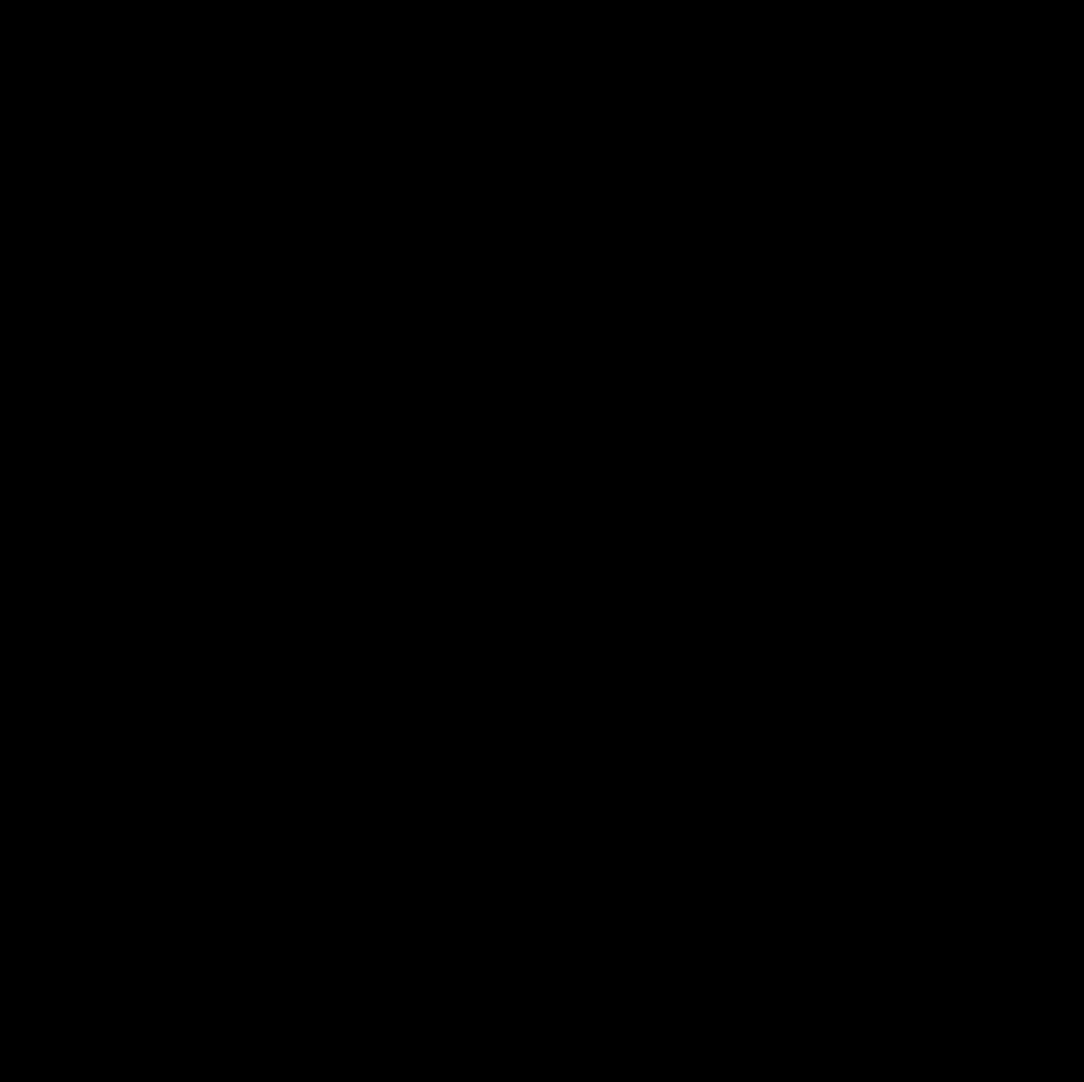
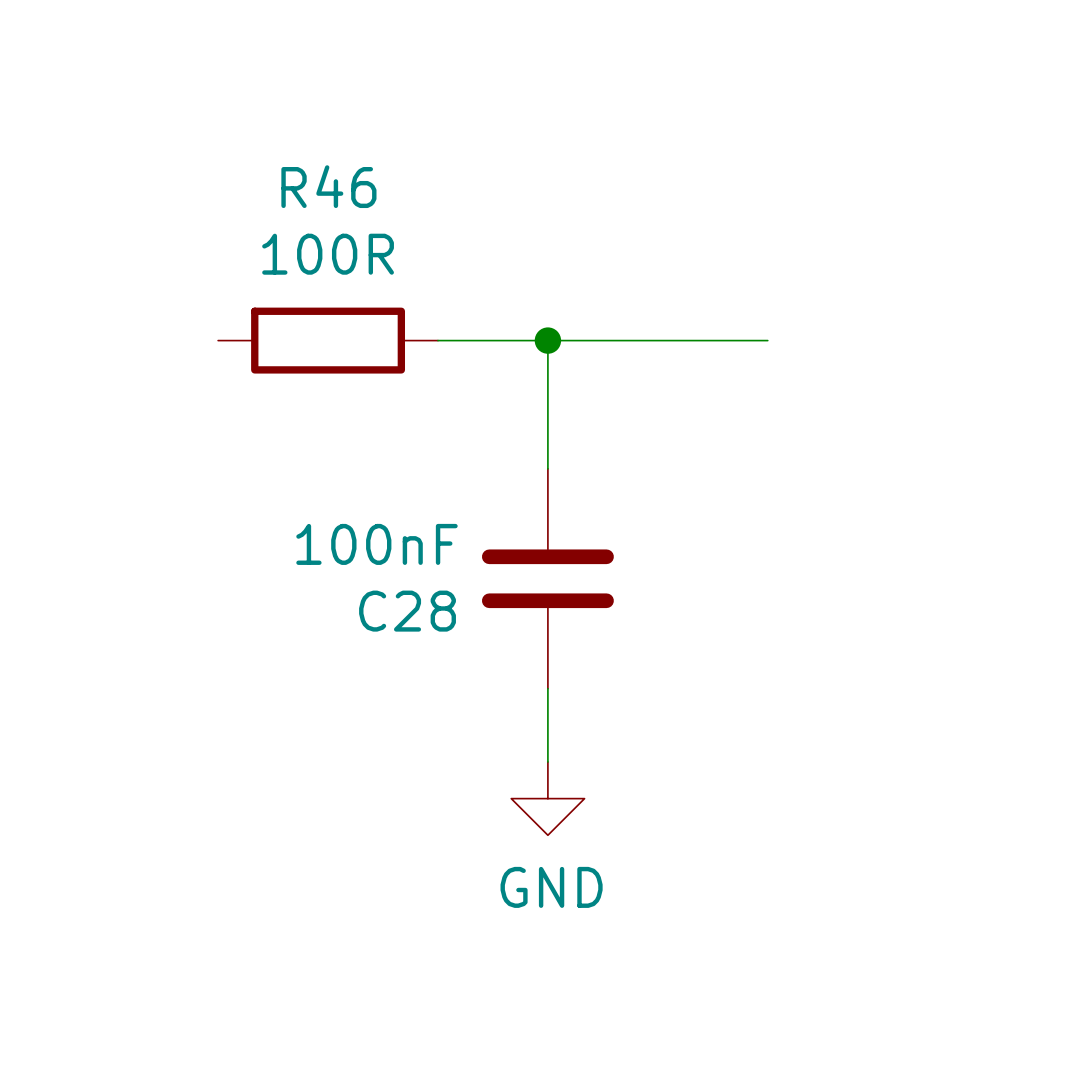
R46: none -> 100R (328, 340)
wire: none -> (437, 340) (767, 340)
wire: none -> (547, 340) (547, 468)
junction: none -> (547, 340)
C28: none -> 100nF (547, 578)
wire: none -> (547, 688) (547, 761)
power symbol: none -> GND (547, 798)

